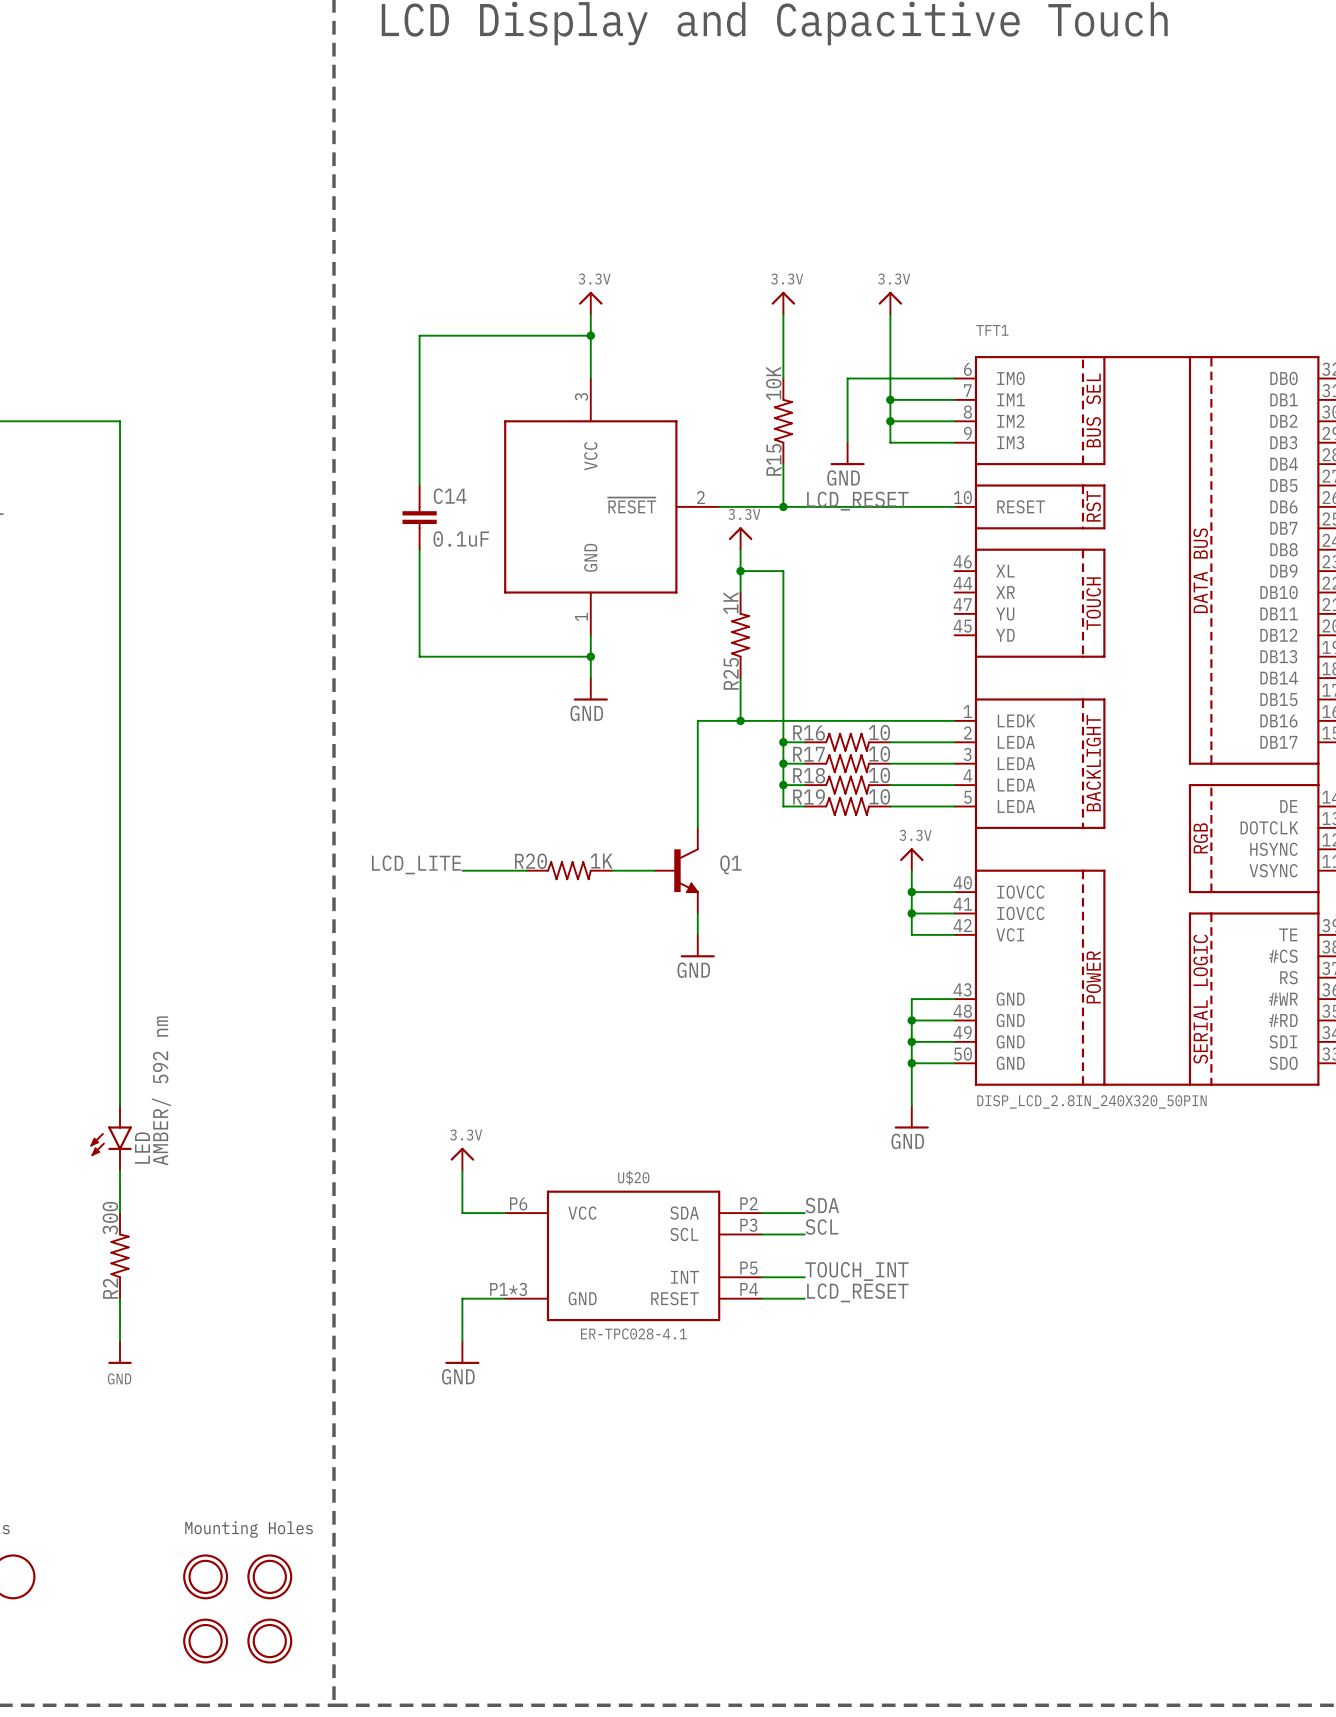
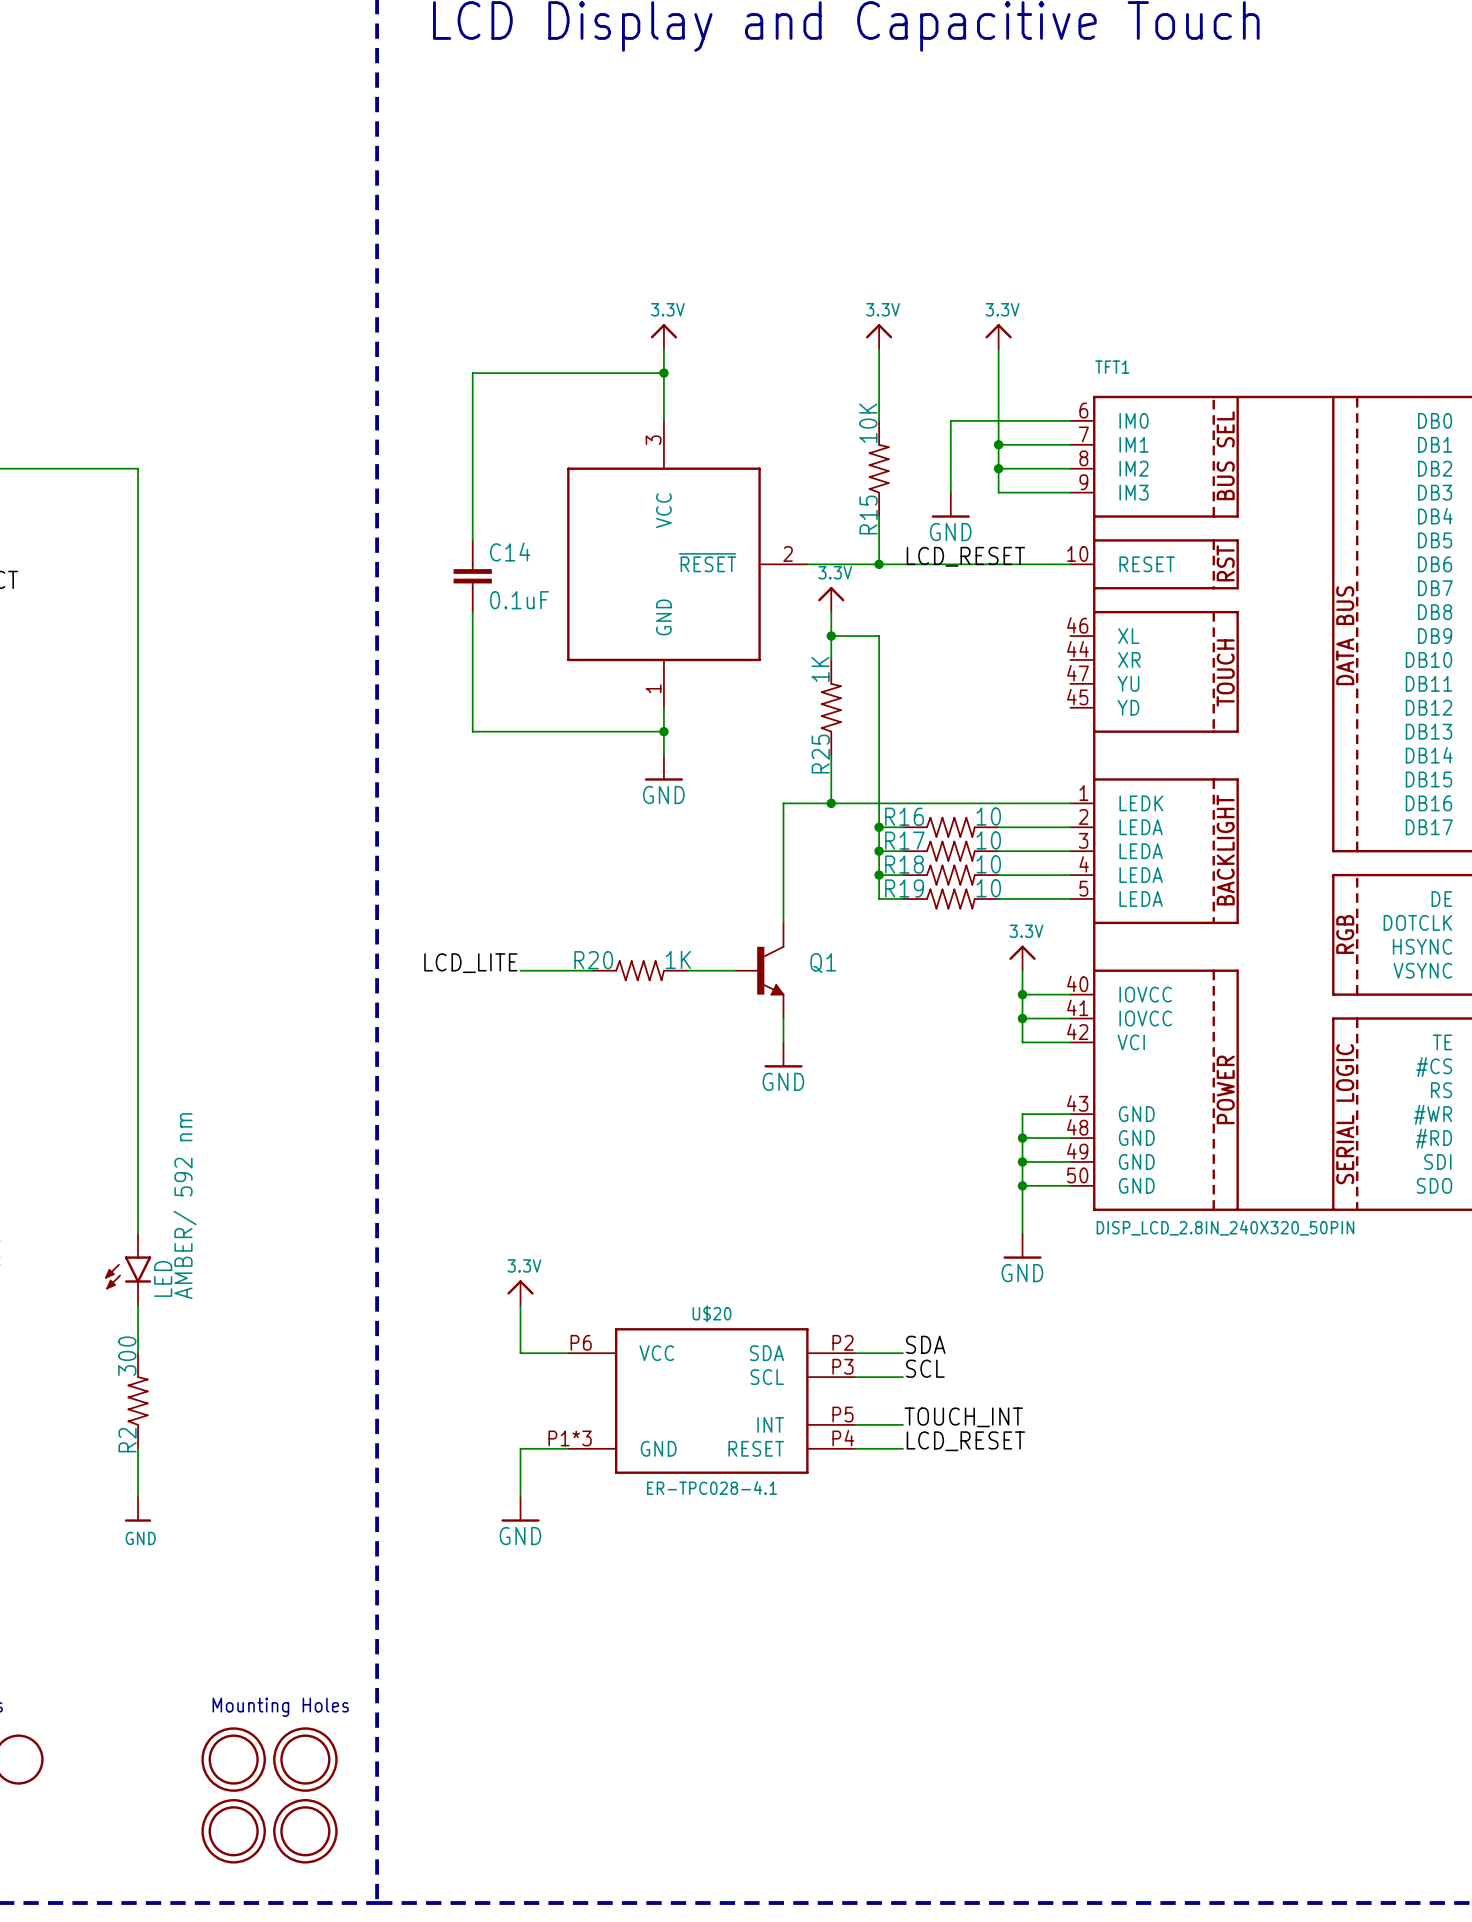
part symbol: [183, 1554, 229, 1600] -> [201, 1727, 266, 1792]
part symbol: [247, 1554, 293, 1600] -> [273, 1727, 338, 1792]
part symbol: [183, 1618, 229, 1664] -> [201, 1799, 266, 1864]
part symbol: [247, 1618, 293, 1664] -> [273, 1799, 338, 1864]

